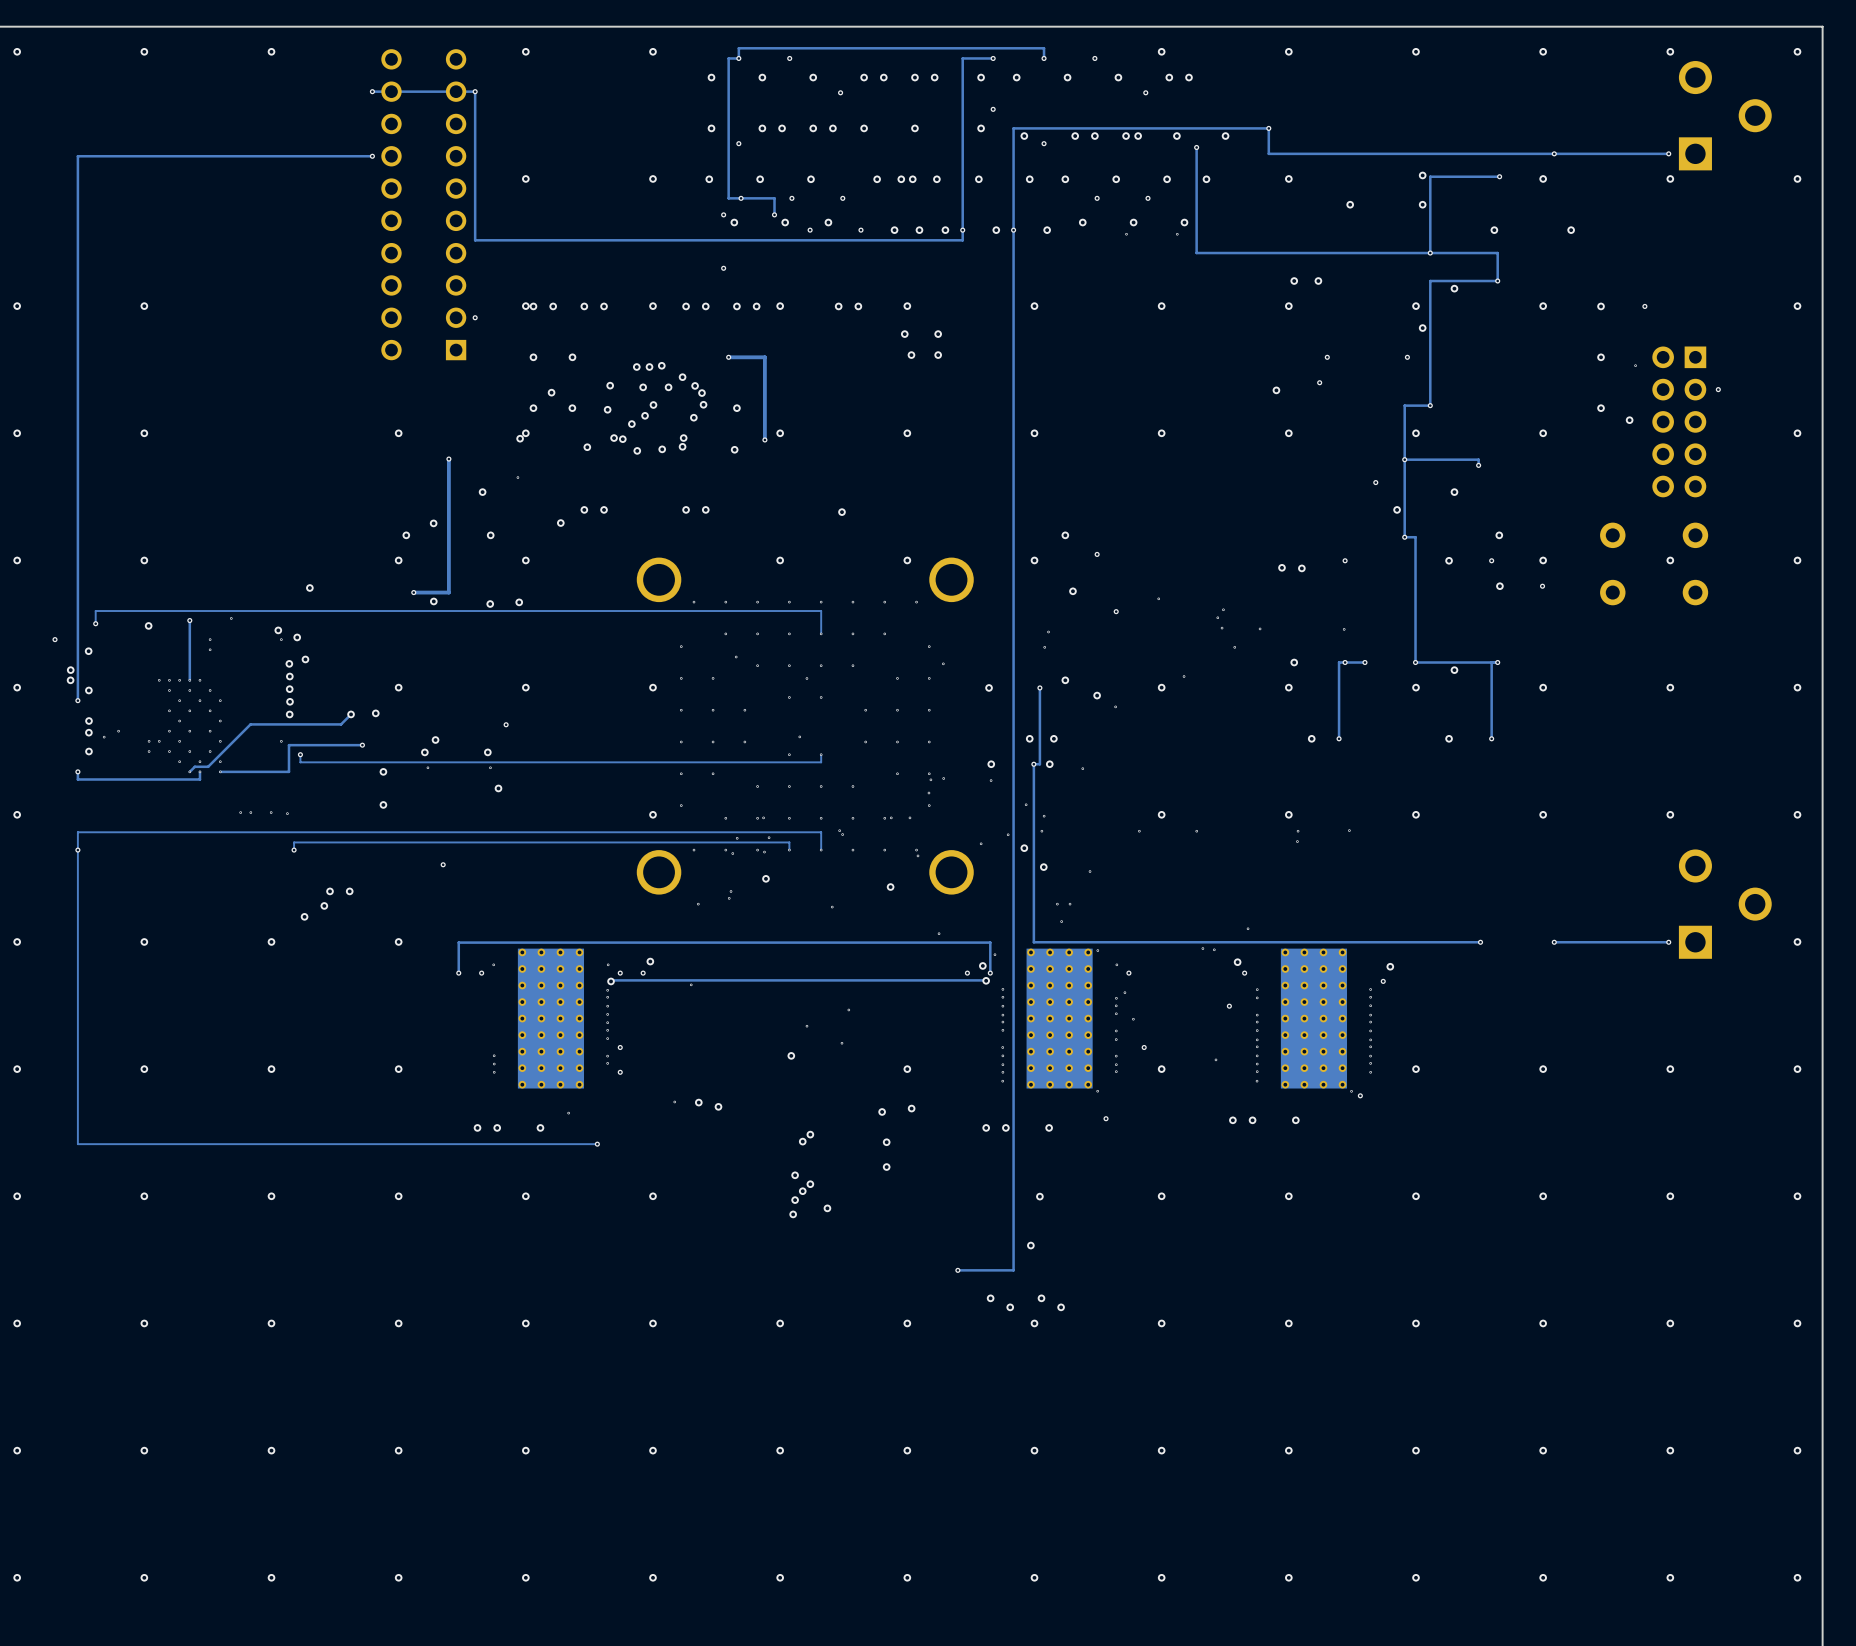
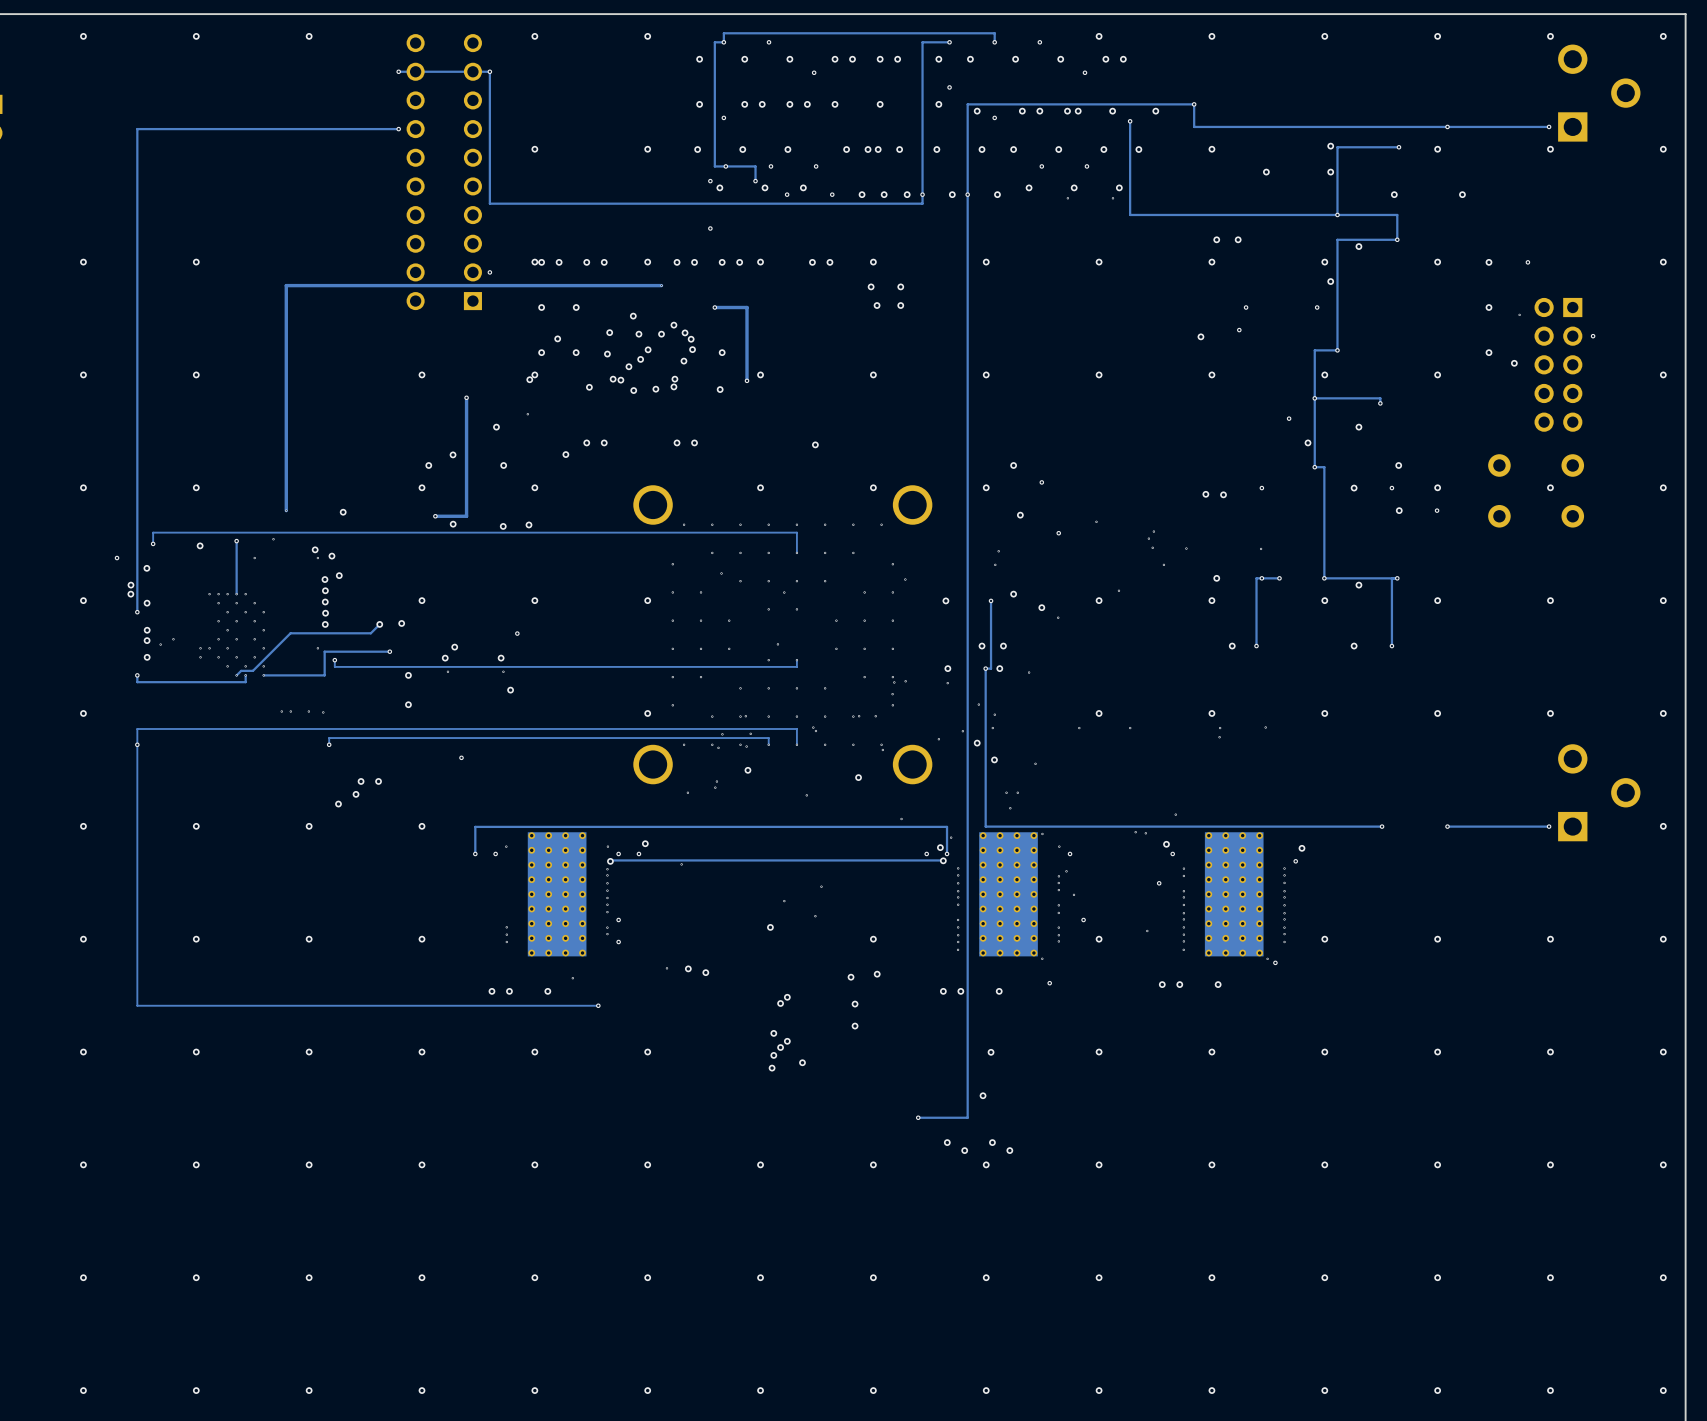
track: none -> (661, 285) (286, 285) (286, 510)
via: none -> (661, 285)
via: (661, 365) -> none
via: (649, 367) -> none
via position: (210, 649) -> (286, 510)

